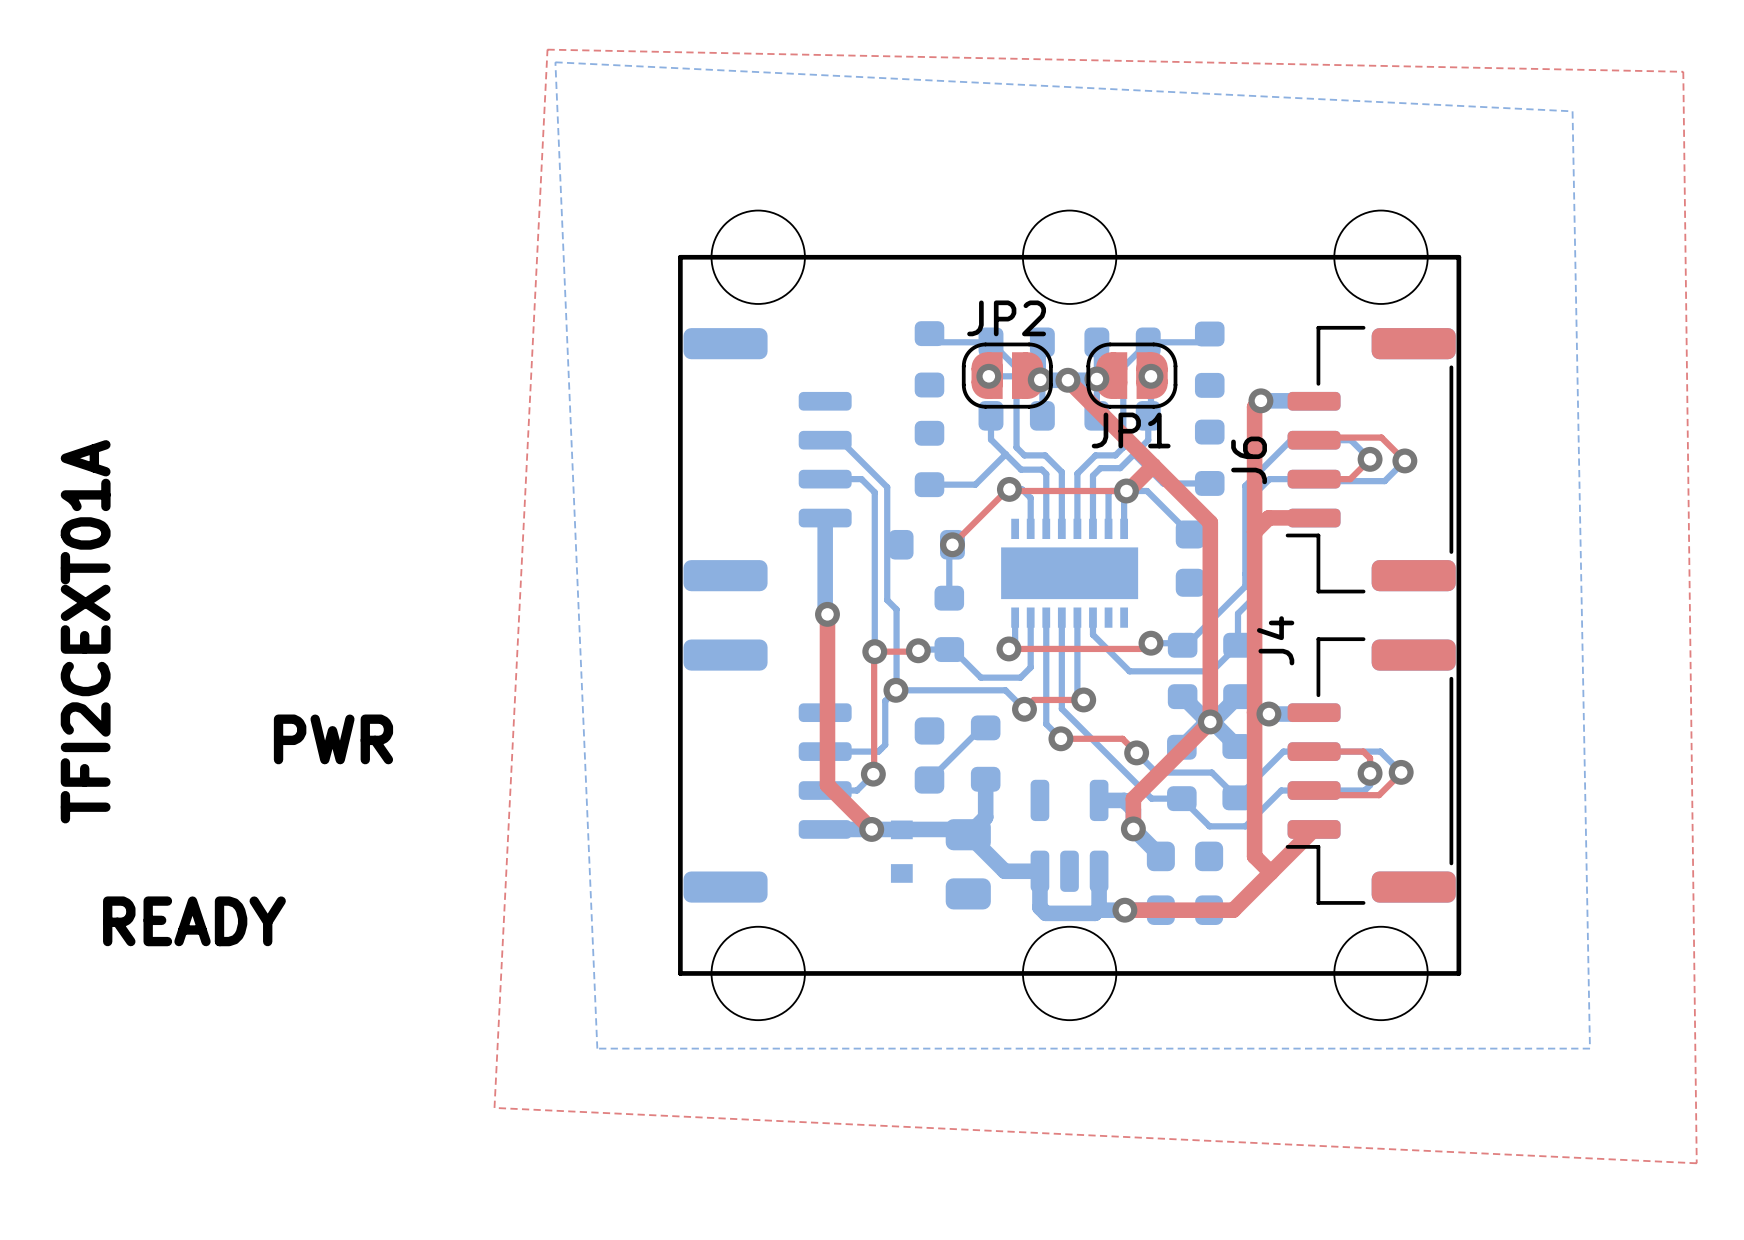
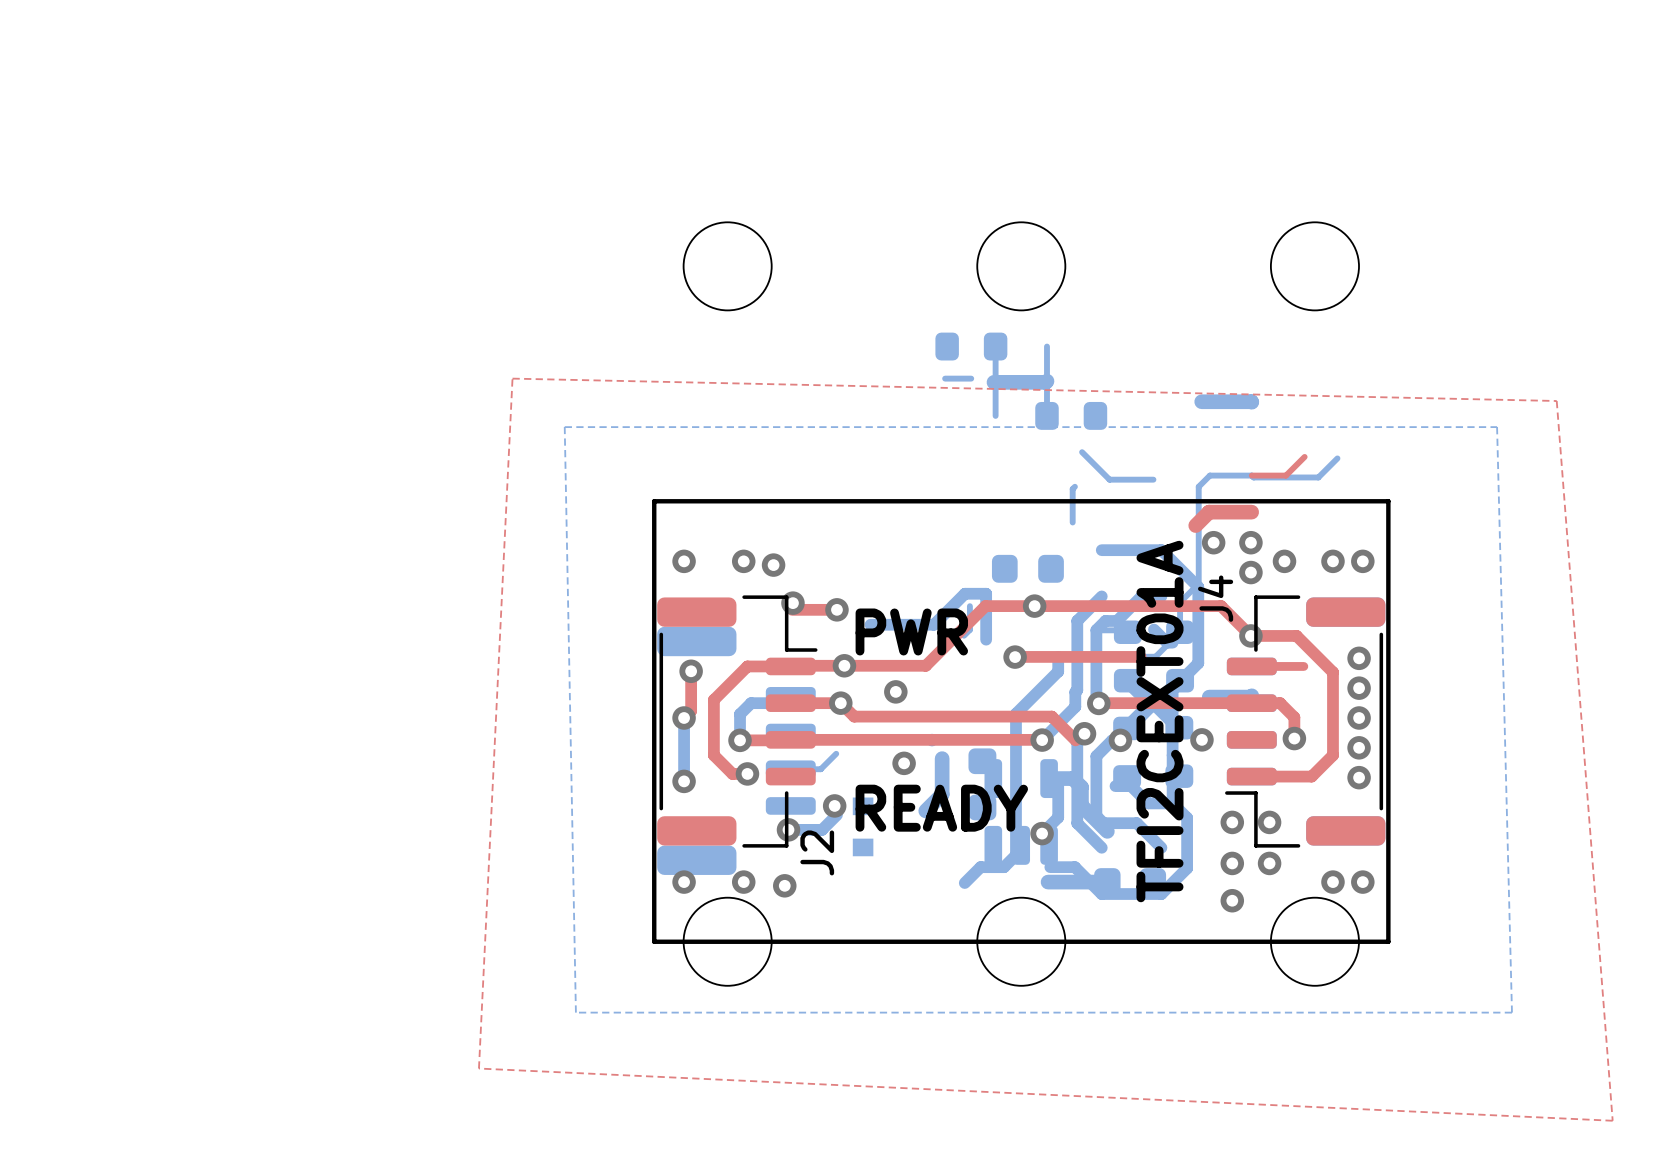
bottom track: (929, 333) (938, 342) (990, 342) (1016, 367) (1016, 447) (1024, 455) (1045, 455) (1061, 472) (1061, 528) -> none
bottom track: (1209, 334) (1201, 342) (1148, 342) (1123, 367) (1123, 447) (1115, 455) (1095, 455) (1077, 473) (1077, 528) -> none
part: (1122, 342) -> none
part: (929, 359) -> none
part: (1209, 359) -> none
JP2: (1007, 375) -> none
JP1: (1131, 375) -> none
via: (988, 376) -> none
bottom track: (1150, 376) (1150, 413) (1148, 415) (1148, 440) (1120, 468) (1100, 468) (1092, 475) (1092, 528) -> none
via: (1150, 376) -> none
via: (1040, 379) -> none
via: (1096, 379) -> none
top track: (1067, 380) (1210, 522) (1210, 721) (1133, 798) (1133, 828) -> none
via: (1067, 380) -> none
top track: (1260, 400) (1254, 407) (1254, 856) (1270, 872) -> none
via: (1260, 400) -> none
bottom track: (990, 415) (990, 439) (1021, 469) (1041, 469) (1046, 474) (1046, 528) -> none
part: (1016, 415) -> none
bottom track: (840, 440) (887, 487) (887, 600) (896, 609) (896, 689) (885, 701) (885, 744) (878, 751) (825, 751) -> none
top track: (1314, 440) (1316, 437) (1381, 437) (1404, 460) -> none
bottom track: (1005, 454) (975, 484) (929, 484) -> none
part: (1209, 457) -> none
part: (929, 458) -> none
J2 side: bottom (767, 459) -> top (737, 721)
bottom track: (1370, 459) (1350, 440) (1290, 440) (1245, 485) (1245, 586) (1179, 652) -> none
J6: (1370, 459) -> none
via: (1370, 459) -> none
via: (1404, 460) -> none
top track: (1153, 465) (1128, 490) (1010, 490) (1007, 489) (952, 544) -> none
bottom track: (825, 479) (861, 479) (874, 492) (874, 651) -> none
bottom track: (1009, 489) (1022, 489) (1030, 498) (1030, 528) -> none
via: (1009, 489) -> none
via: (1126, 490) -> none
board edge: (680, 506) (680, 257) (1458, 257) (1458, 506) -> (654, 501) (1388, 501)
bottom track: (825, 518) (825, 612) (827, 614) -> none
part footprint: [1001, 518, 1139, 628] -> [991, 554, 1064, 583]
bottom track: (1108, 528) (1108, 493) (1110, 490) (1147, 490) (1190, 534) -> none
part: (926, 544) -> none
bottom track: (952, 544) (949, 547) (949, 598) -> none
via: (952, 544) -> none
via: none -> (1213, 542)
via: none -> (1250, 542)
bottom track: none -> (1101, 550) (1161, 550) (1198, 587) (1198, 663) (1172, 688) (1172, 803)
part: (1190, 558) -> none
via: none -> (684, 561)
via: none -> (743, 561)
via: none -> (1284, 561)
via: none -> (1332, 561)
via: none -> (1362, 561)
via: none -> (773, 565)
via: none -> (1250, 572)
bottom track: none -> (1101, 596) (1077, 620) (1077, 690) (1075, 692) (1075, 706) (1042, 740)
bottom track: none -> (1161, 596) (1141, 596) (1117, 621) (1105, 621) (1096, 630) (1096, 701) (1098, 703)
top track: (827, 614) (827, 785) (871, 829) -> none
bottom track: (1030, 617) (1030, 667) (1020, 677) (980, 677) (952, 649) (918, 650) (923, 650) -> none
bottom track: (1046, 617) (1046, 724) (1060, 738) -> none
bottom track: (1061, 617) (1061, 708) (1151, 798) (1181, 798) (1209, 826) (1245, 826) (1281, 790) (1364, 790) (1370, 785) (1370, 773) -> none
bottom track: (1077, 617) (1077, 693) (1083, 699) -> none
via: none -> (1034, 606)
bottom track: (1092, 617) (1092, 634) (1129, 671) -> none
top track: none -> (792, 609) (836, 609)
via: none -> (836, 609)
part: (949, 623) -> none
text: TFI2CEXT01A (85, 631) -> none
bottom track: none -> (870, 624) (933, 624) (964, 593) (986, 593) (986, 639)
bottom track: none -> (1153, 629) (1167, 642) (1172, 642)
top track: (1150, 643) (1145, 648) (1008, 648) -> none
via: (1150, 643) -> none
via: (1008, 648) -> none
via: none -> (1250, 635)
top track: (918, 650) (874, 652) (873, 774) -> none
via: (918, 650) -> none
via: (874, 651) -> none
top track: none -> (1015, 656) (1140, 656)
via: none -> (1015, 657)
bottom track: none -> (1058, 656) (1058, 671) (1015, 713) (1015, 855) (1004, 867) (980, 867) (964, 883)
via: none -> (1359, 658)
top track: none -> (1251, 666) (1303, 666)
top track: none -> (691, 671) (691, 710) (684, 717)
via: none -> (691, 671)
bottom track: (895, 690) (1005, 690) (1024, 709) -> none
via position: (895, 690) -> (844, 665)
top track: (1083, 699) (1033, 699) (1024, 709) -> none
via: (1083, 699) -> none
via: none -> (1359, 688)
via: none -> (895, 691)
via: (1024, 709) -> none
via: (1268, 714) -> none
top track: none -> (790, 703) (840, 703) (854, 716) (1051, 716) (1075, 740)
bottom track: none -> (790, 703) (751, 703) (740, 714) (740, 740)
via: none -> (840, 703)
via: none -> (1098, 703)
top track: none -> (1099, 703) (1280, 703) (1294, 717) (1294, 738)
via: (1210, 721) -> none
bottom track: (985, 727) (981, 727) (929, 780) -> none
bottom track: none -> (684, 717) (684, 781)
via: none -> (684, 717)
via: none -> (1359, 717)
top track: (1060, 738) (1122, 738) (1136, 752) -> none
via: (1060, 738) -> none
text position: PWR (333, 739) -> PWR (911, 631)
text: none -> TFI2CEXT01A (1160, 721)
top track: (1314, 751) (1363, 751) (1370, 758) (1370, 773) -> none
bottom track: (1136, 752) (1156, 772) (1211, 772) (1237, 797) (1283, 751) (1380, 751) (1401, 772) -> none
part: (985, 753) -> none
part position: (929, 755) -> (982, 784)
via: none -> (740, 740)
top track: none -> (1041, 739) (740, 740)
via: none -> (1042, 740)
bottom track: none -> (1075, 740) (1077, 742) (1077, 823) (1101, 847)
bottom track: none -> (1120, 740) (1112, 740) (1096, 756) (1096, 816) (1103, 823) (1136, 823) (1161, 847)
via: none -> (1120, 740)
via: none -> (1201, 739)
via: none -> (1359, 747)
J4 position: (1370, 771) -> (1305, 721)
top track: (1401, 772) (1379, 795) (1318, 795) (1314, 790) (1332, 790) -> none
via: (1401, 772) -> none
via position: (1370, 773) -> (1294, 738)
via: (873, 774) -> none
via: none -> (904, 763)
top track: none -> (747, 773) (732, 773) (713, 755) (713, 699) (747, 666) (925, 665) (985, 606) (1221, 606) (1250, 635) (1296, 635) (1332, 672) (1332, 755) (1311, 776) (1251, 776)
via: none -> (747, 773)
via: none -> (1359, 777)
via: none -> (684, 781)
bottom track: none -> (1058, 786) (1058, 817) (1042, 833)
bottom track: none -> (1115, 786) (1131, 786) (1148, 803) (1172, 803)
bottom track: none -> (1172, 803) (1187, 817) (1187, 868) (1161, 894) (1101, 894) (1074, 867) (1050, 867)
via: (1133, 828) -> none
bottom track: (825, 829) (962, 829) (1004, 871) (1039, 871) (1039, 907) (1045, 913) (1094, 913) (1099, 909) (1099, 871) -> none
top track: (1314, 829) (1233, 910) (1124, 910) -> none
text: none -> READY (941, 808)
bottom track: none -> (836, 814) (822, 829) (788, 829)
via: none -> (1232, 822)
via: none -> (1269, 822)
via: none -> (788, 829)
part: (1185, 856) -> none
via: none -> (1042, 833)
part: (968, 864) -> none
via: none -> (1232, 863)
via: none -> (1269, 863)
via: none -> (684, 882)
via: none -> (743, 882)
via: (1124, 910) -> none
via: none -> (1332, 882)
via: none -> (1362, 882)
via: none -> (784, 885)
text: READY (194, 921) -> none
via: none -> (1232, 900)
bottom zone outline: (597, 1048) (555, 62) (1572, 111) (1589, 1048) -> (575, 1012) (564, 427) (1497, 427) (1511, 1012)
top zone outline: (494, 1107) (547, 49) (1683, 71) (1696, 1163) -> (478, 1068) (512, 378) (1556, 400) (1612, 1120)

